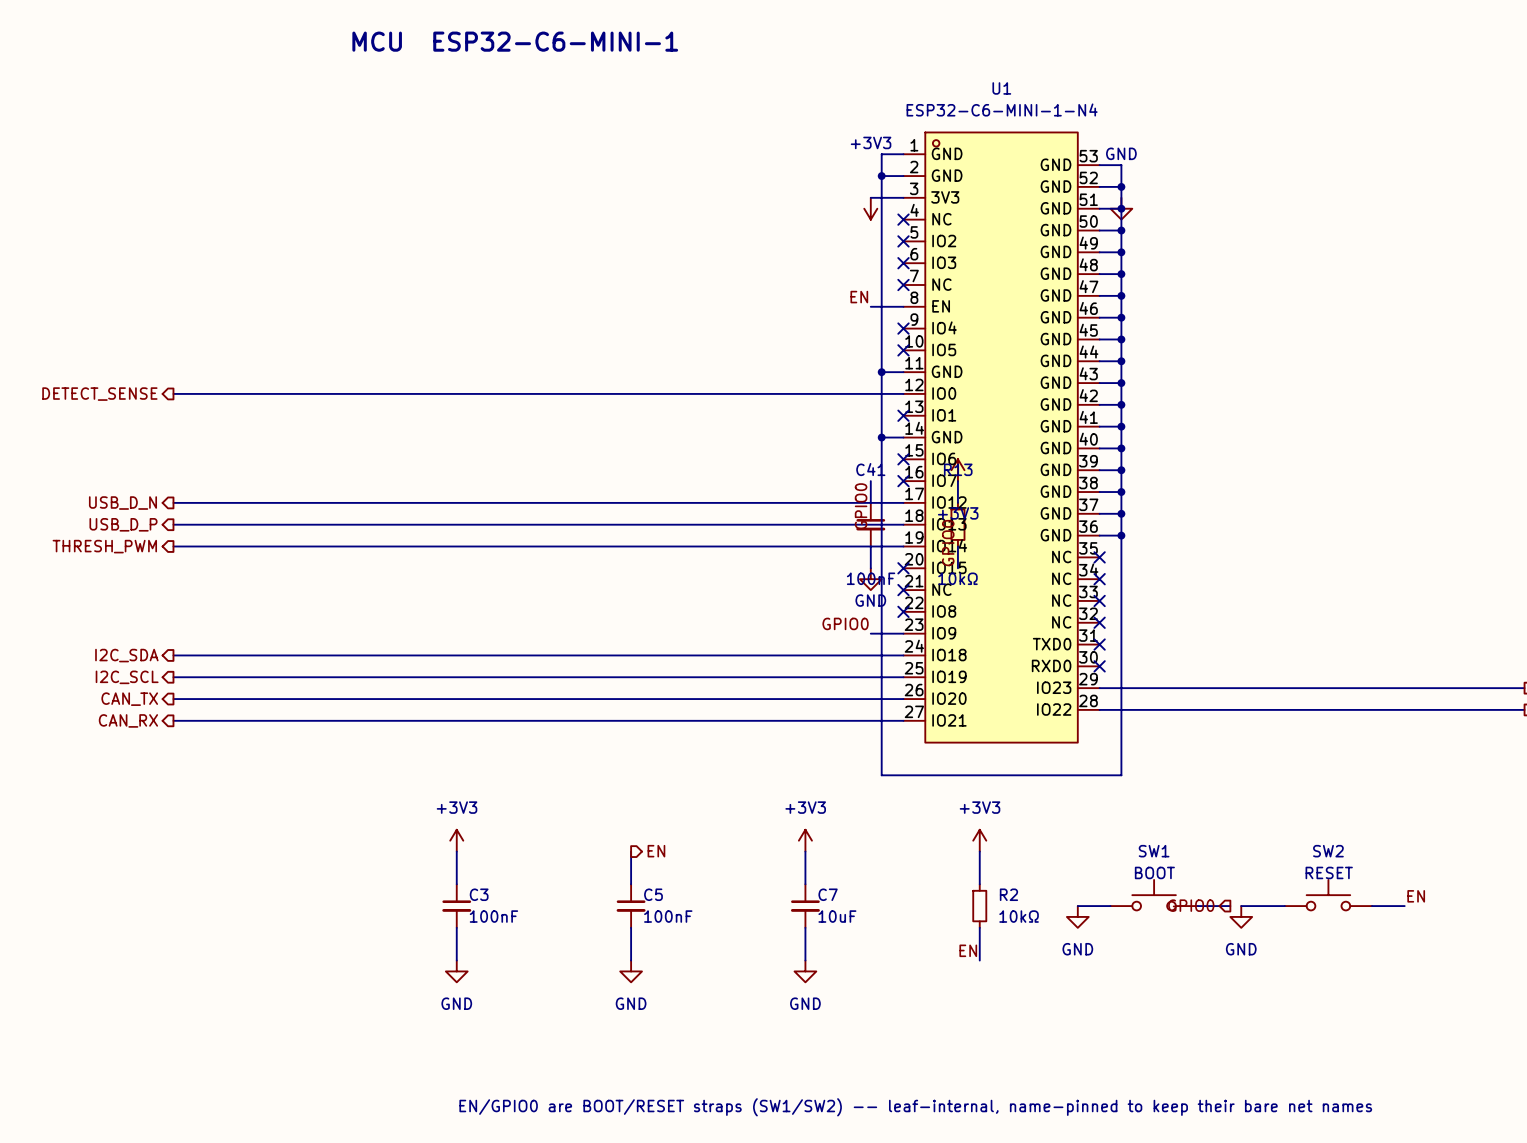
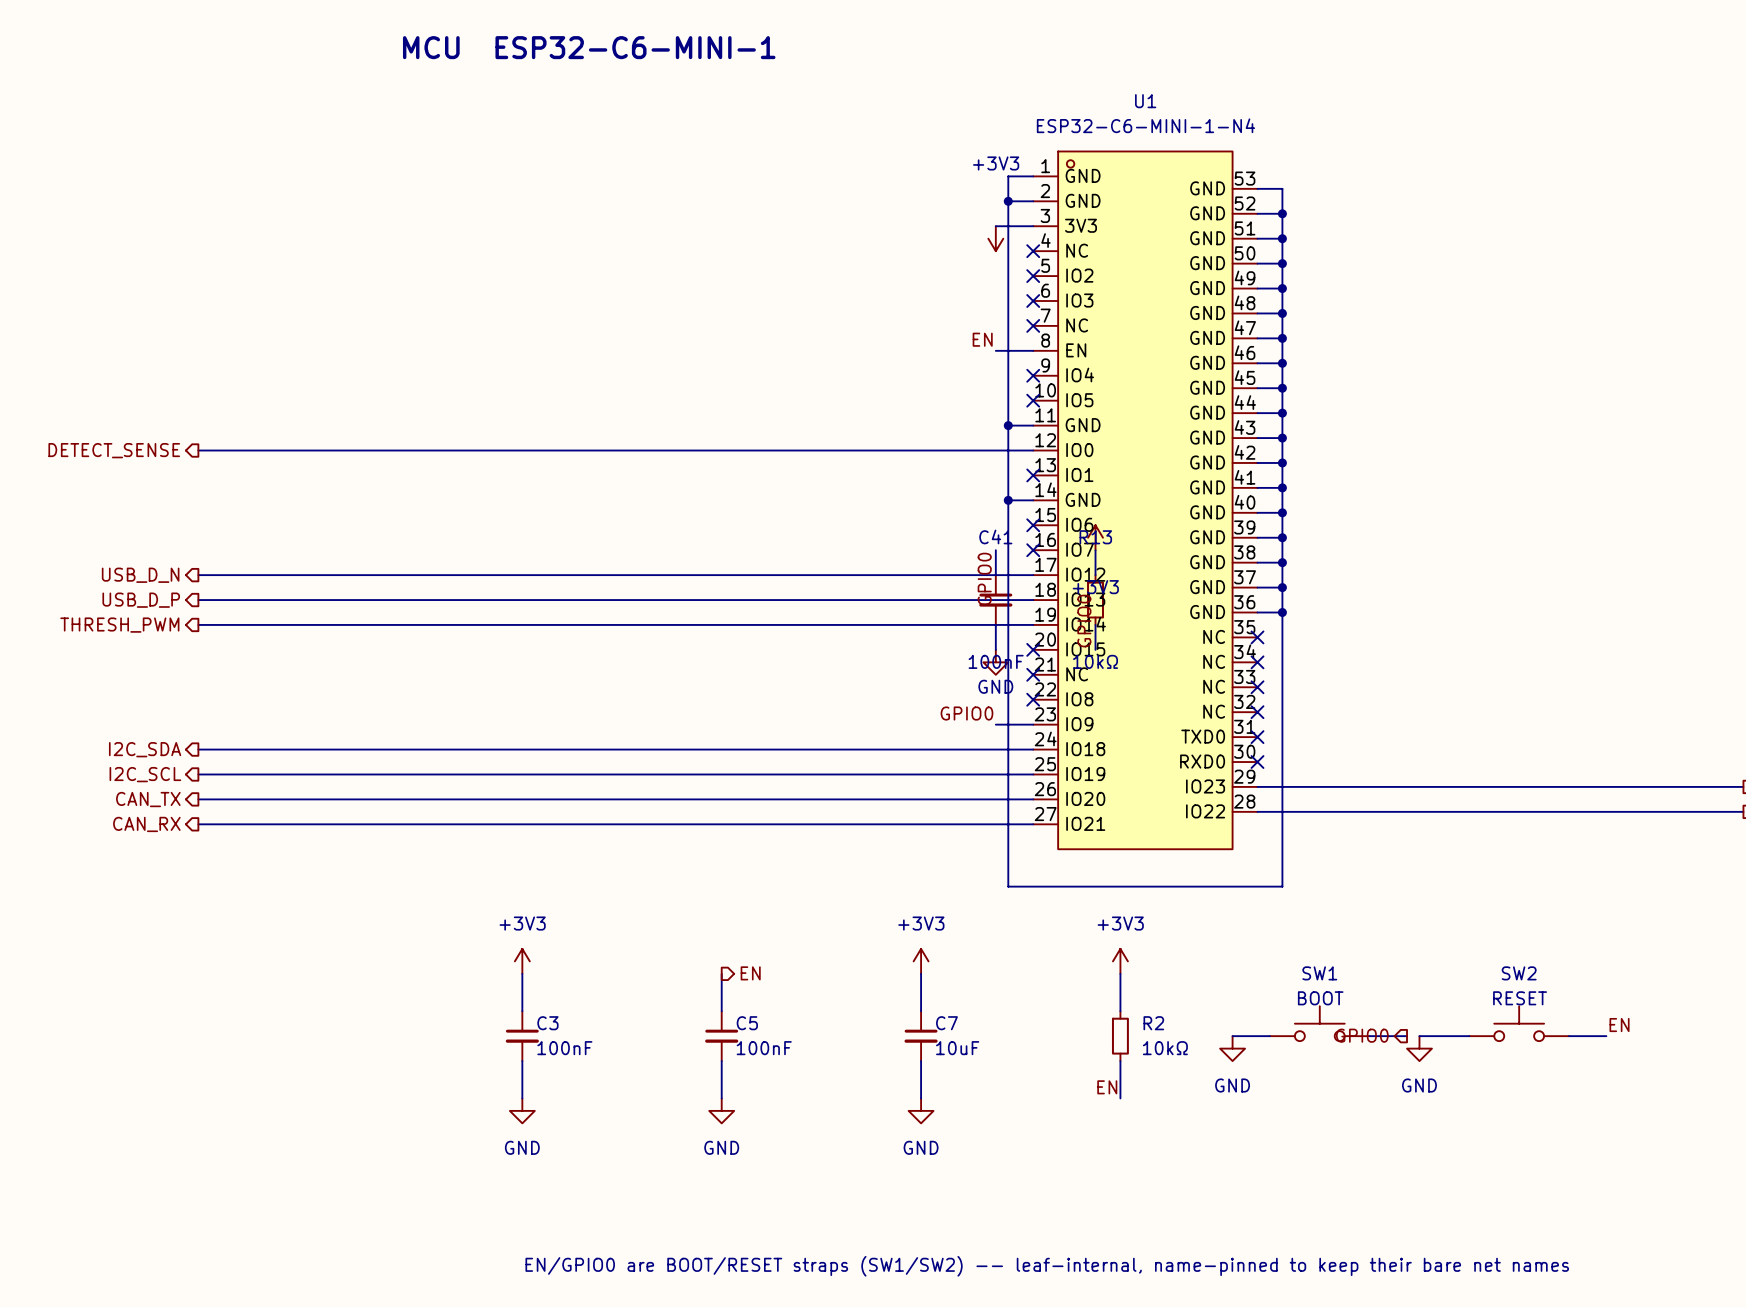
power symbol: GND (1121, 208) -> none

